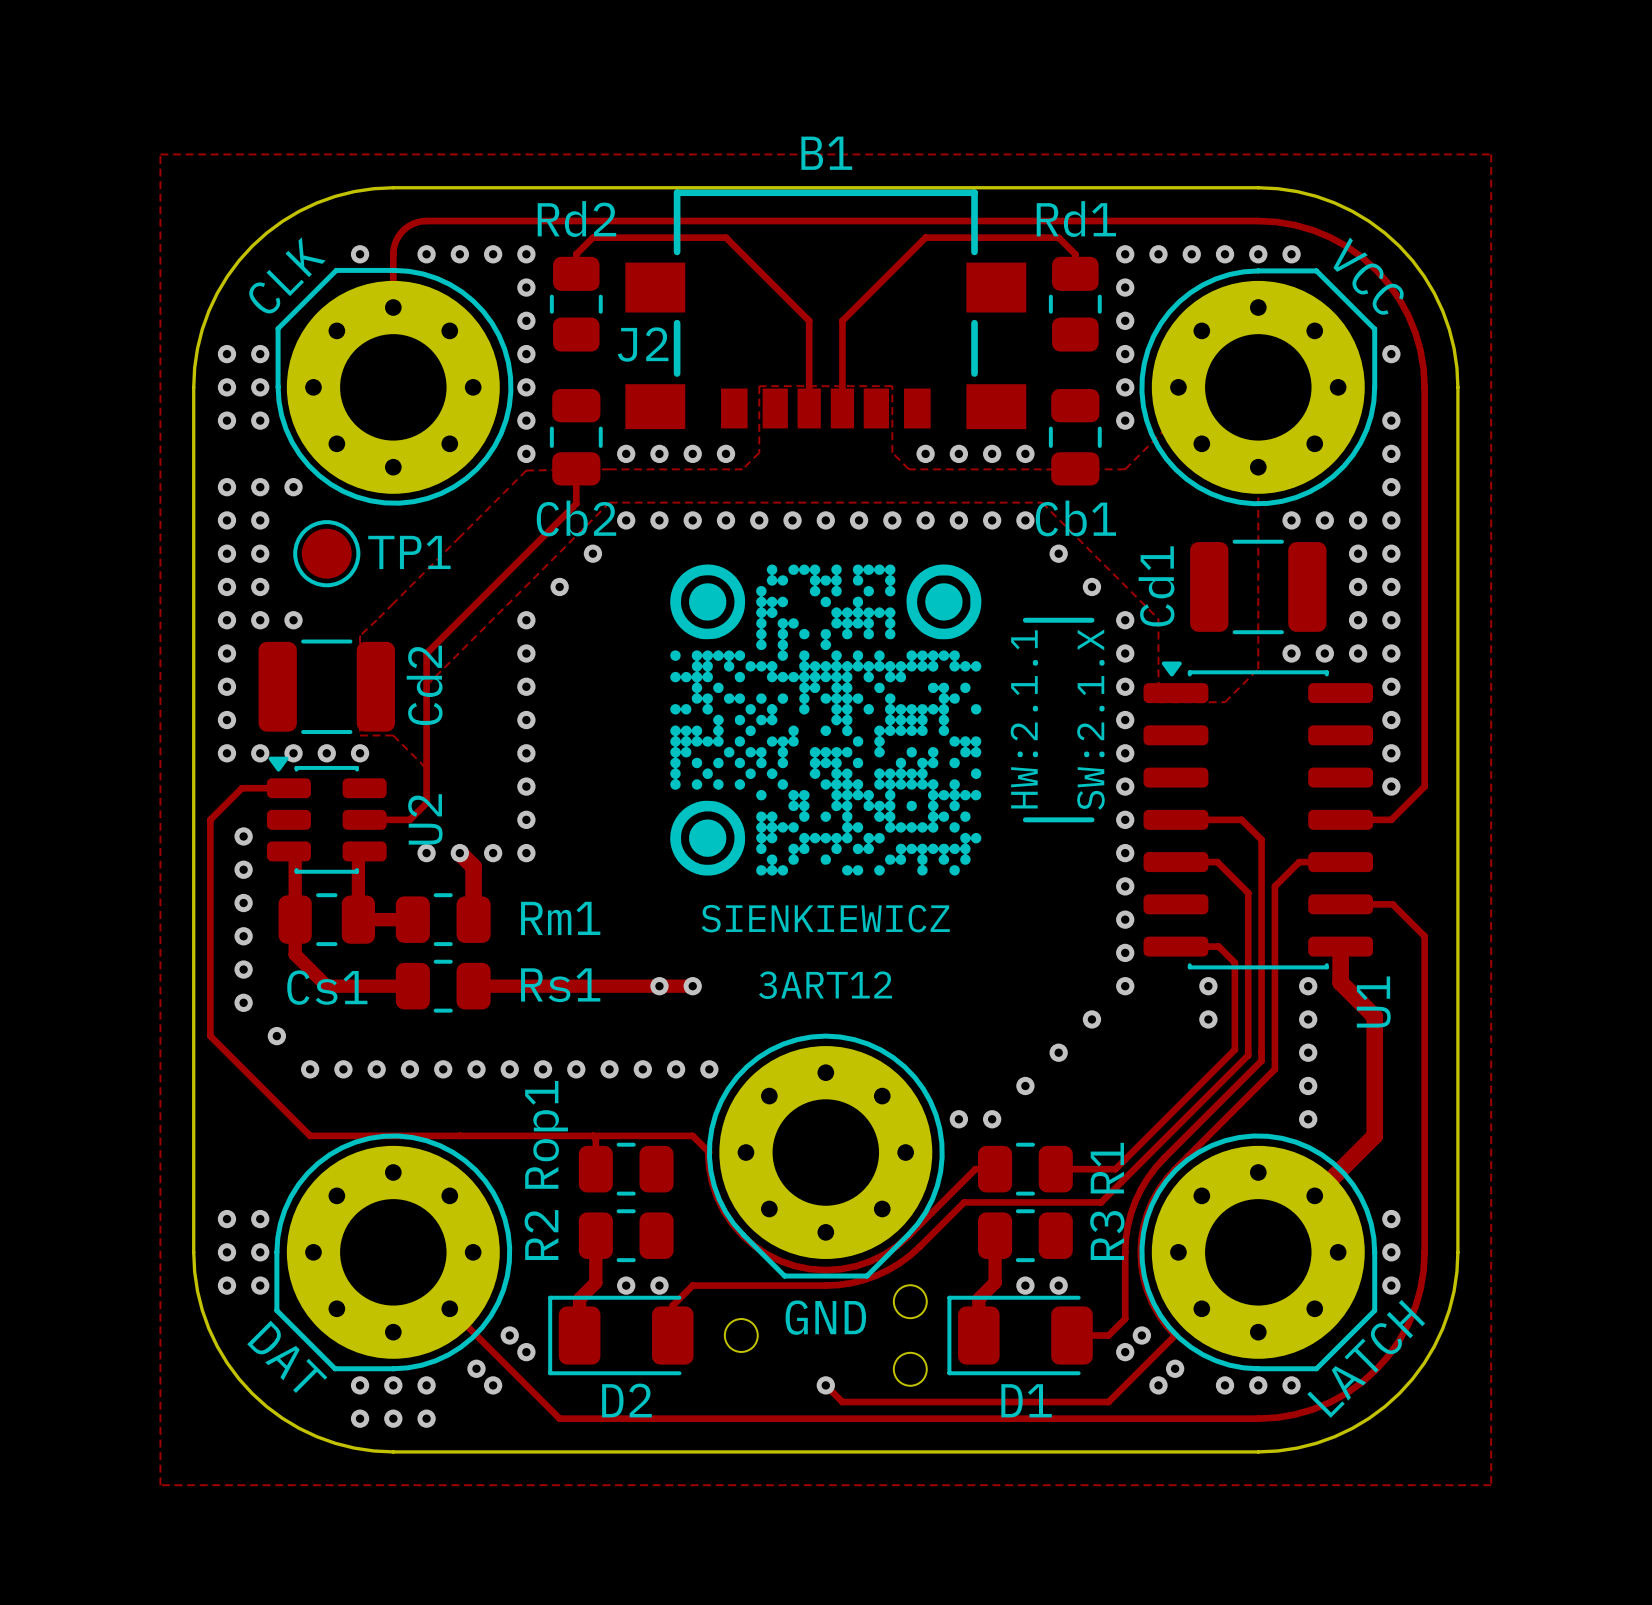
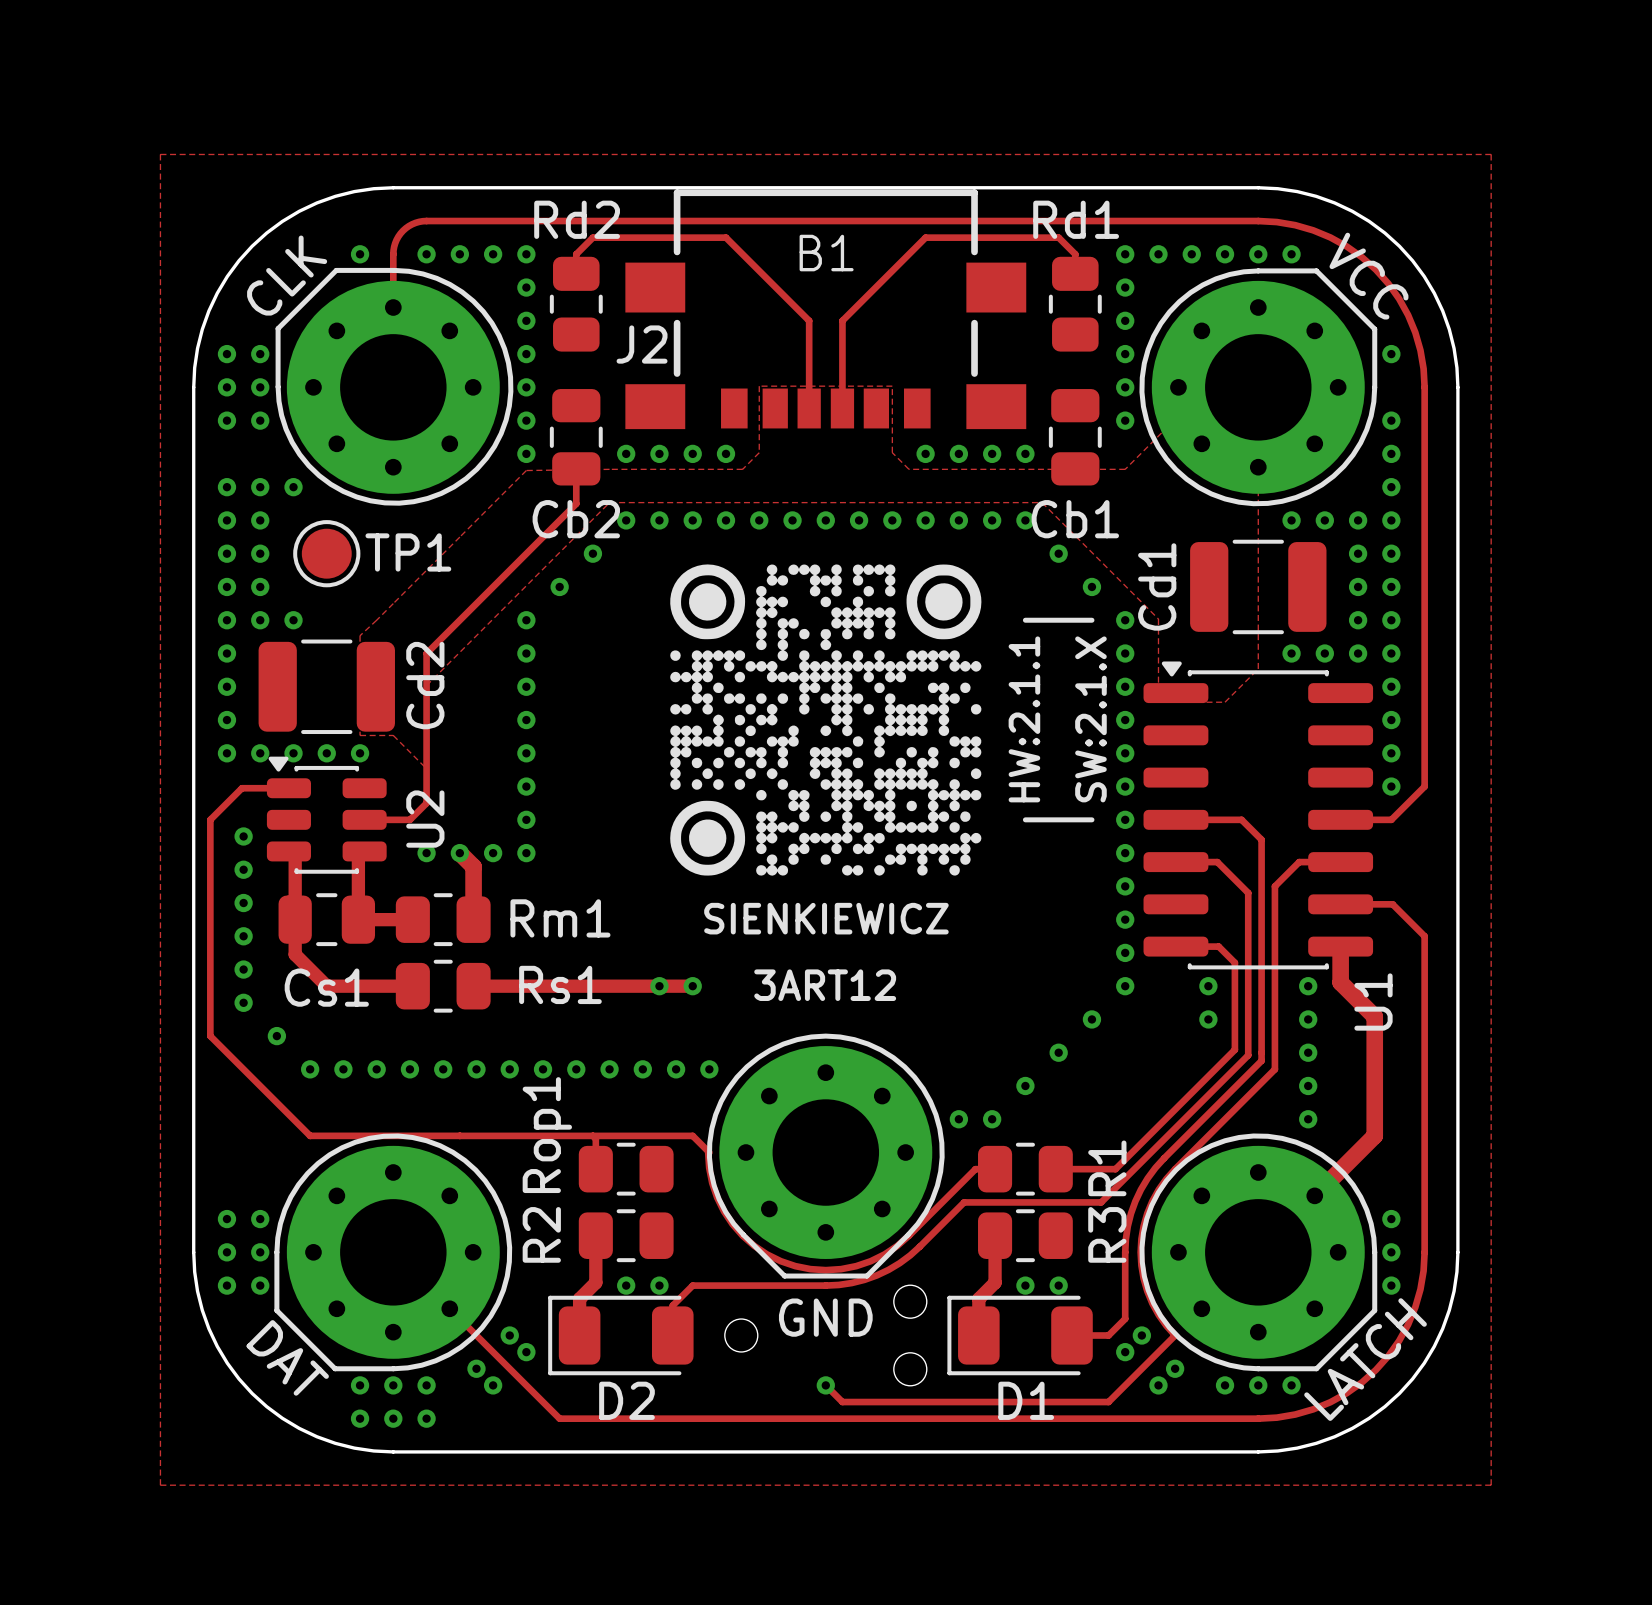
B1 name position: B1 (826, 153) -> B1 (826, 253)

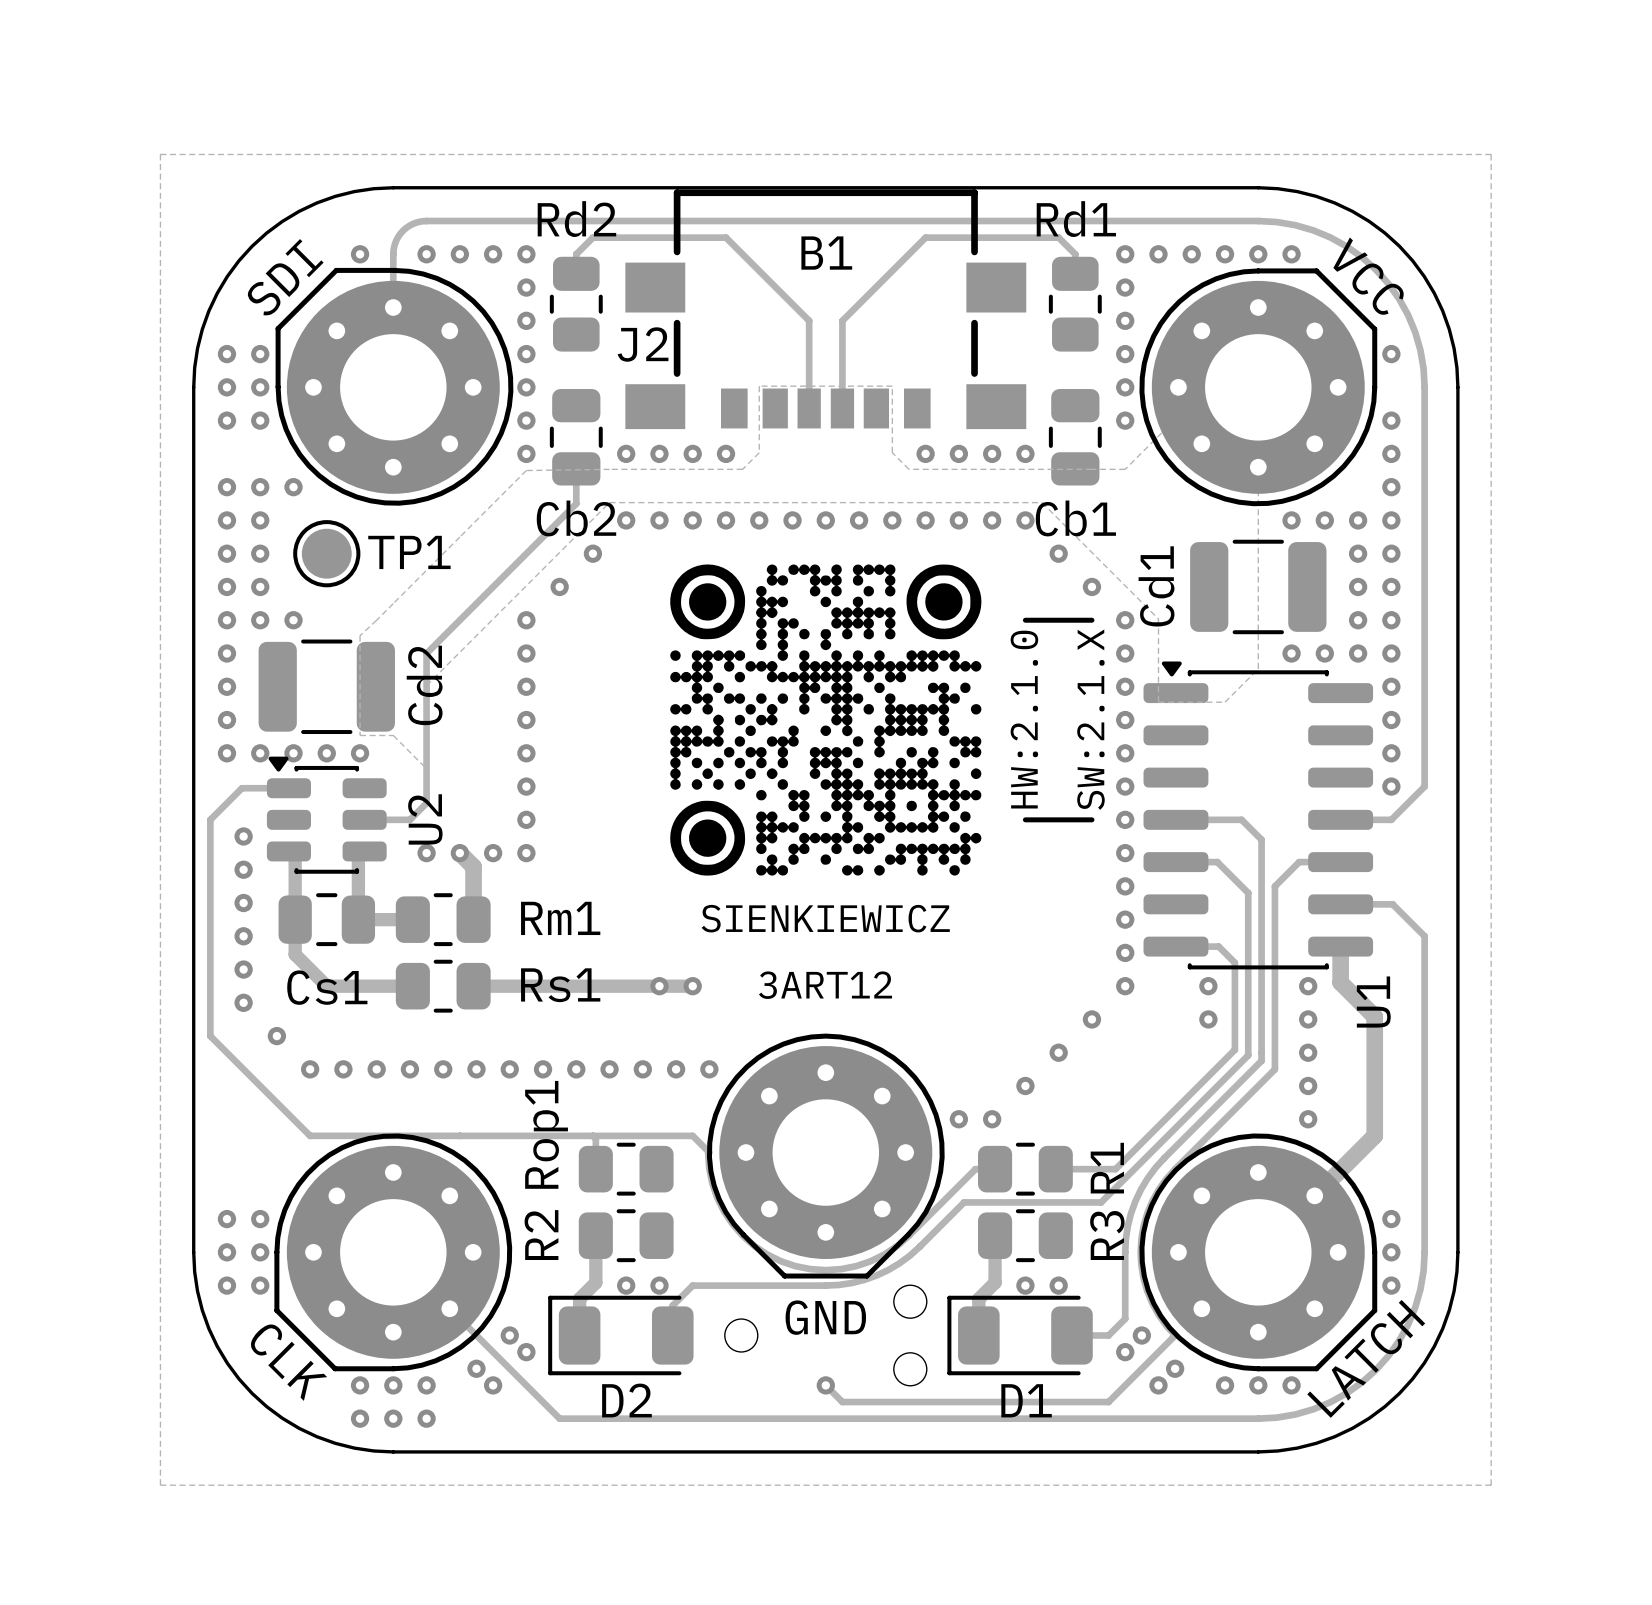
text: CLK (287, 275) -> SDI (285, 277)
text: HW:2.1.1 (1024, 719) -> HW:2.1.0 (1024, 719)
text: DAT (287, 1357) -> CLK (288, 1362)

